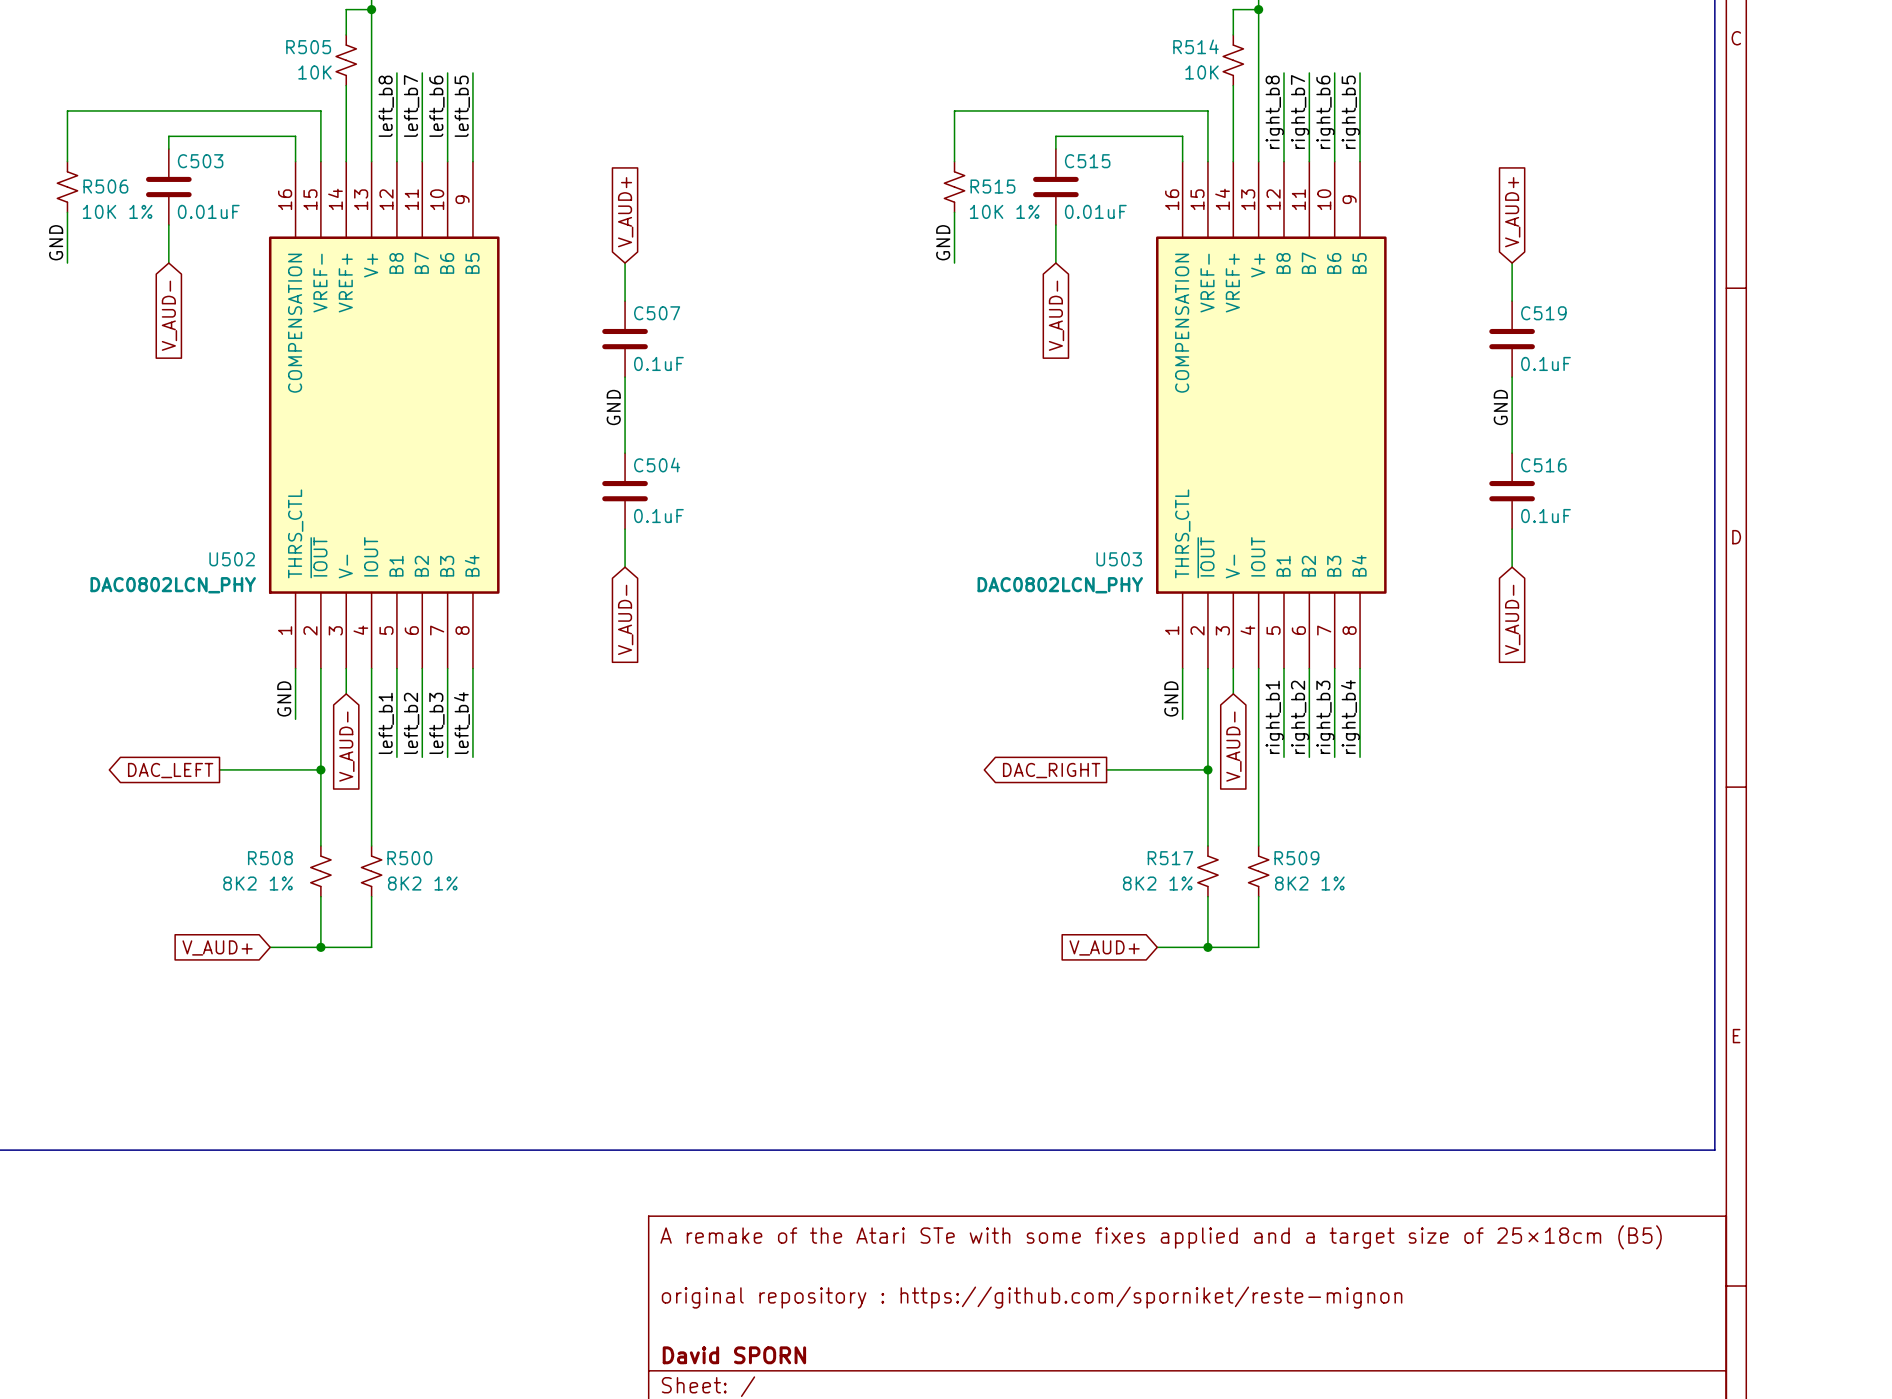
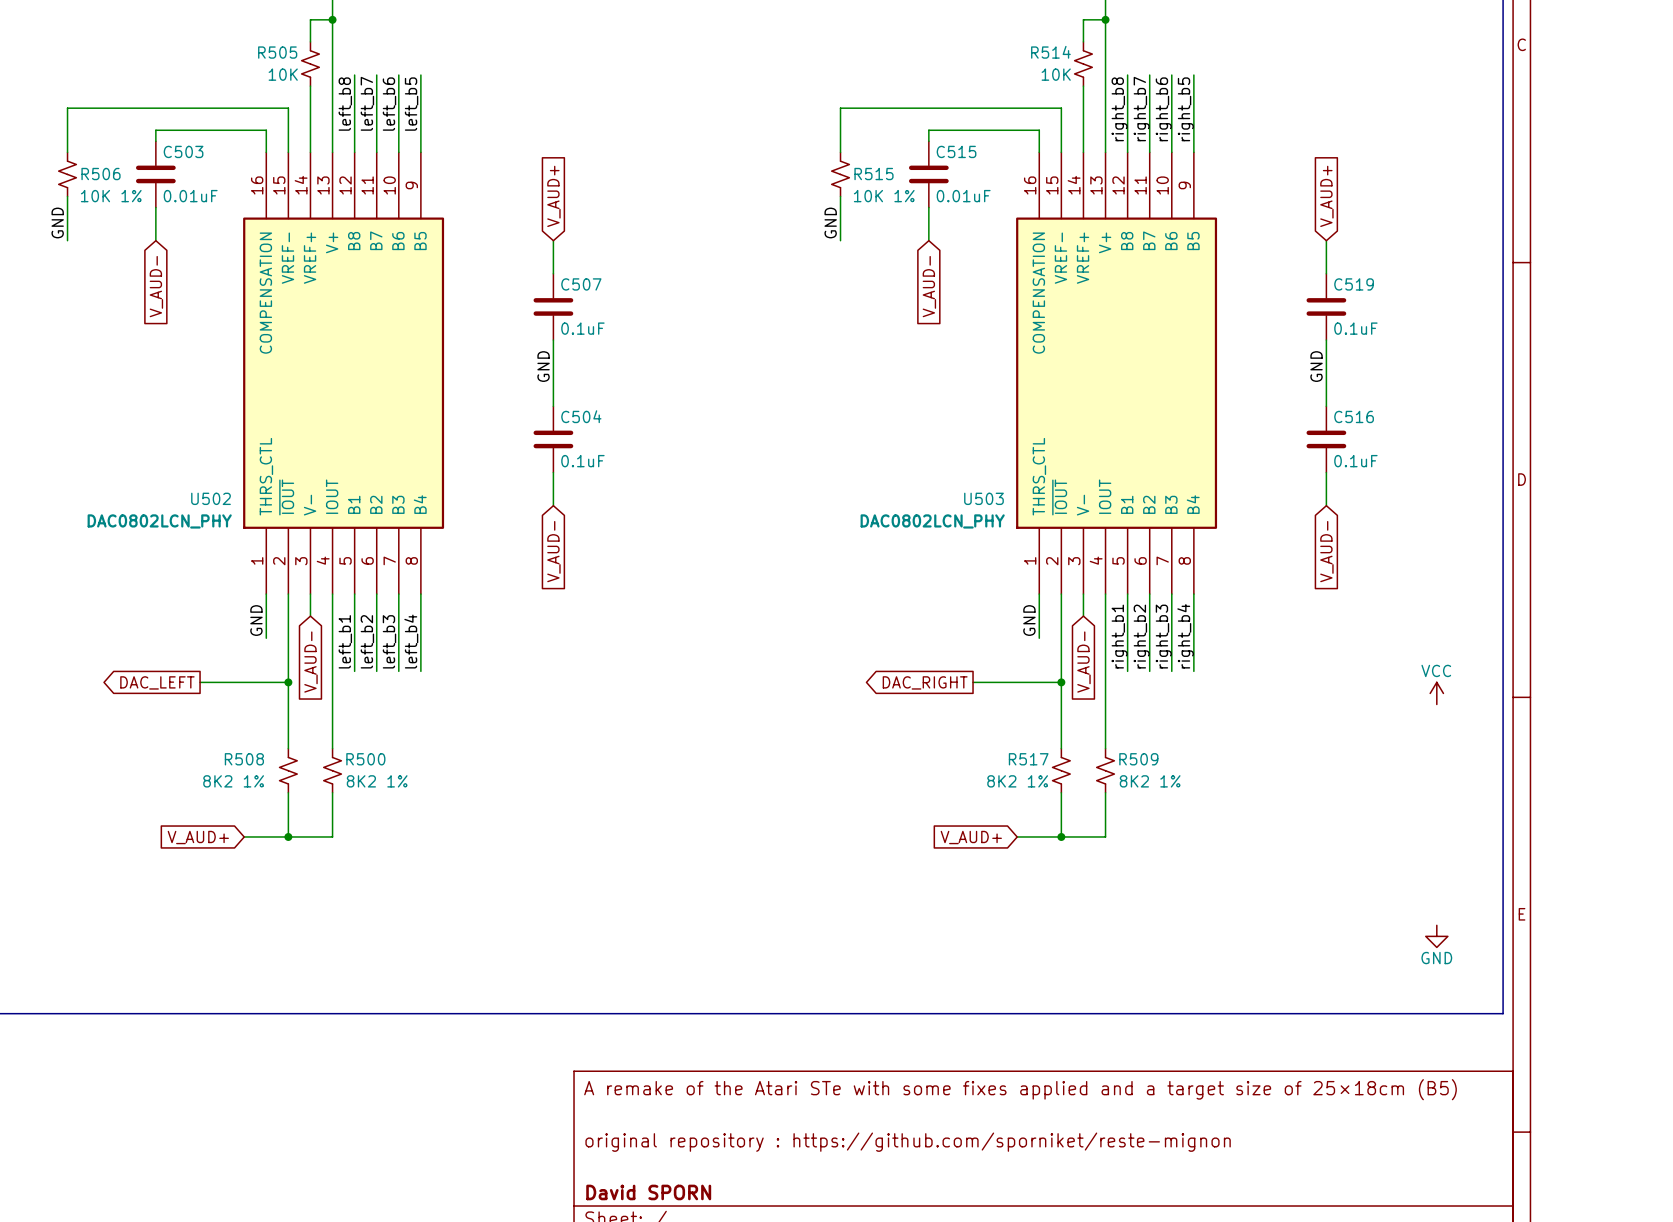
power symbol: none -> VCC (1436, 693)
power symbol: none -> GND (1436, 936)

